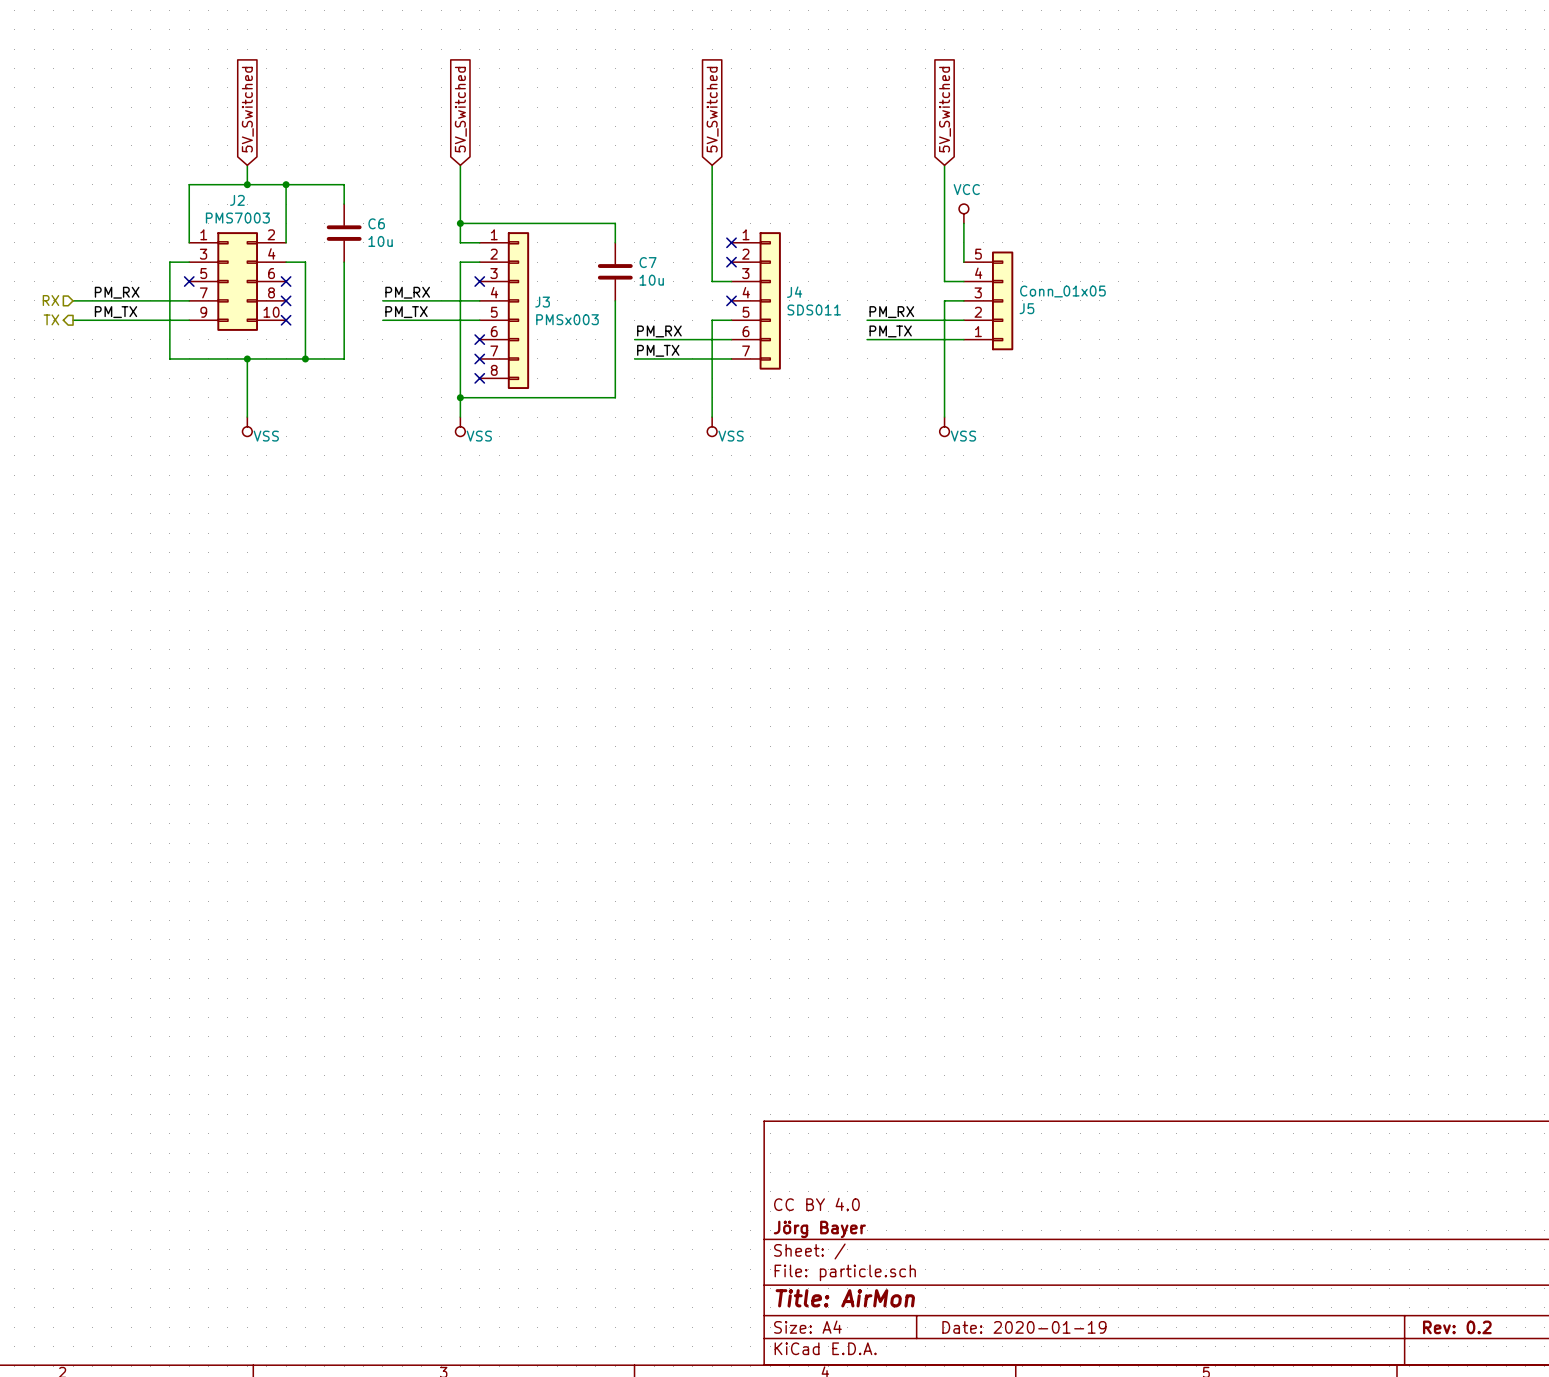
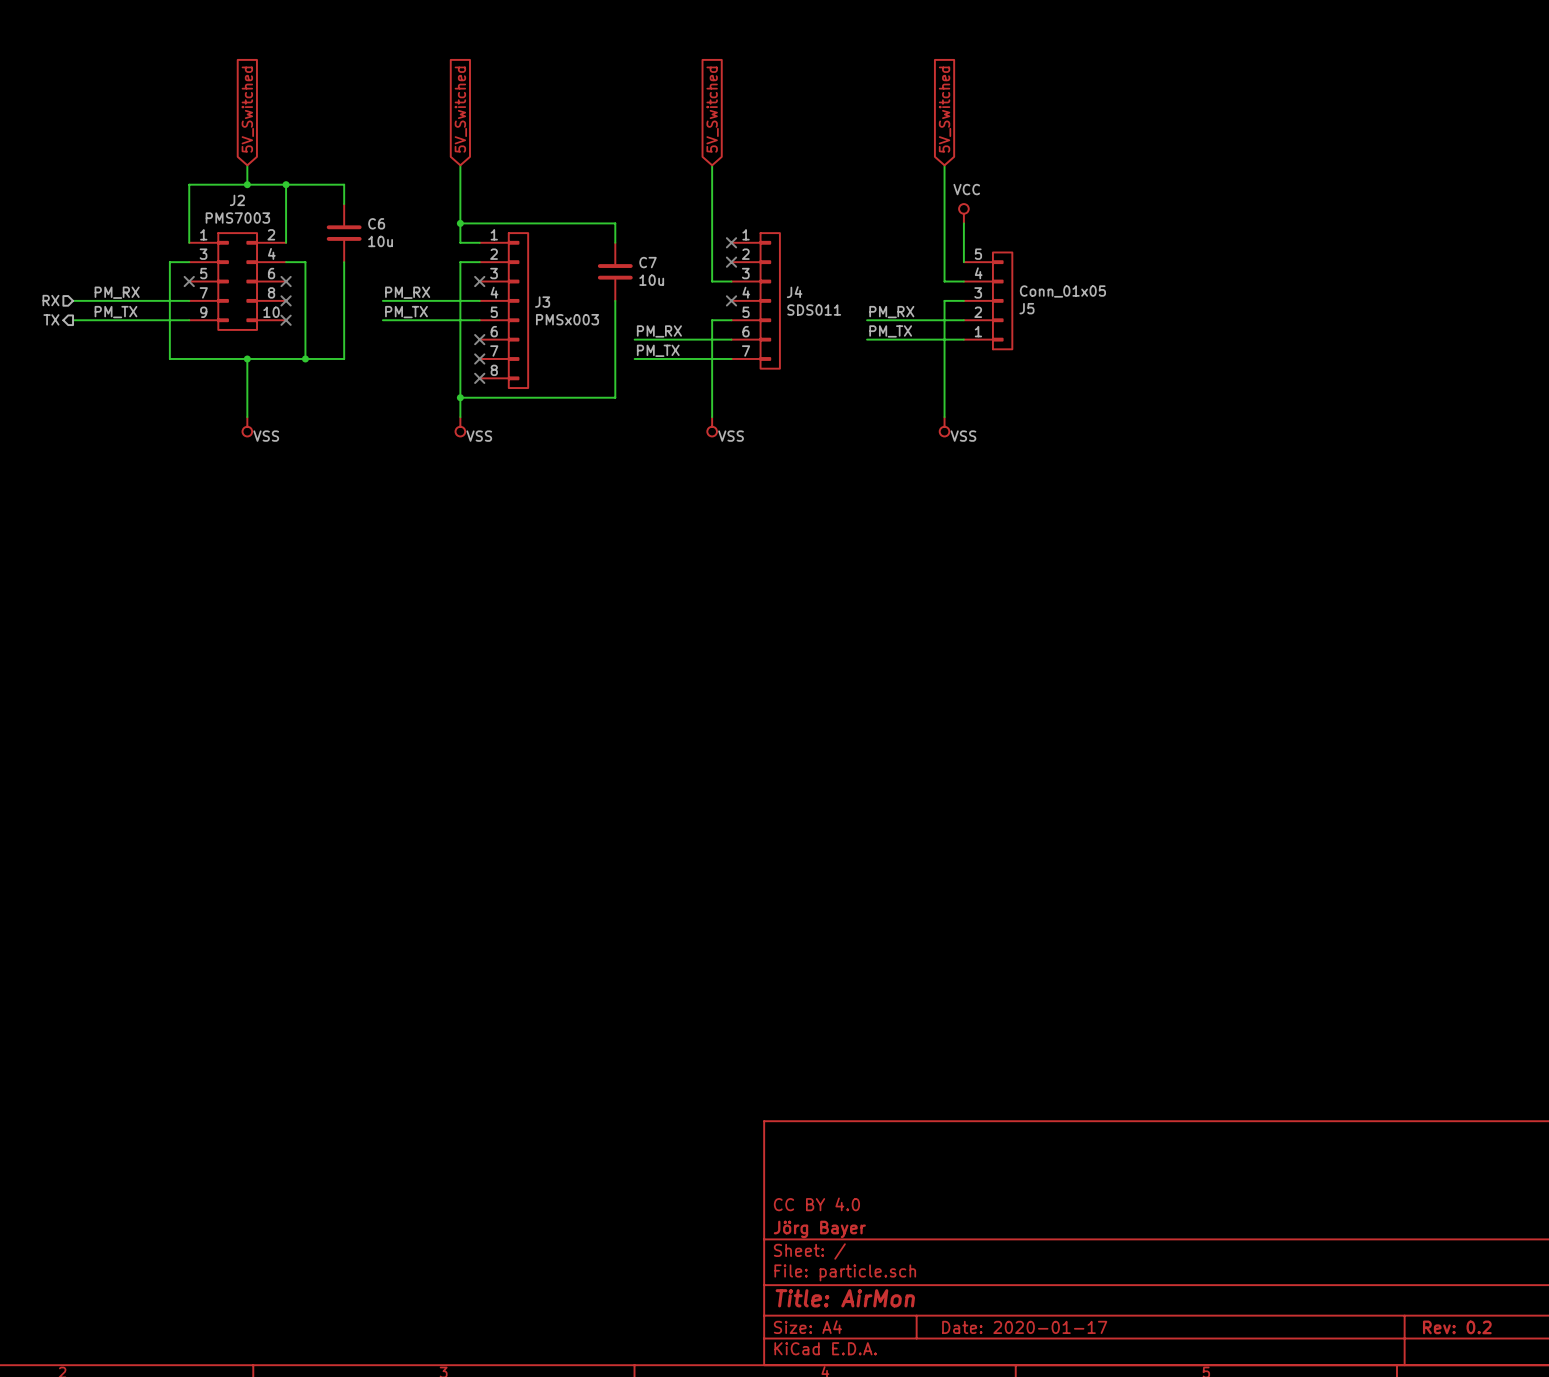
title block: Date: 2020-01-19 (1024, 1327) -> Date: 2020-01-17 (1024, 1327)

